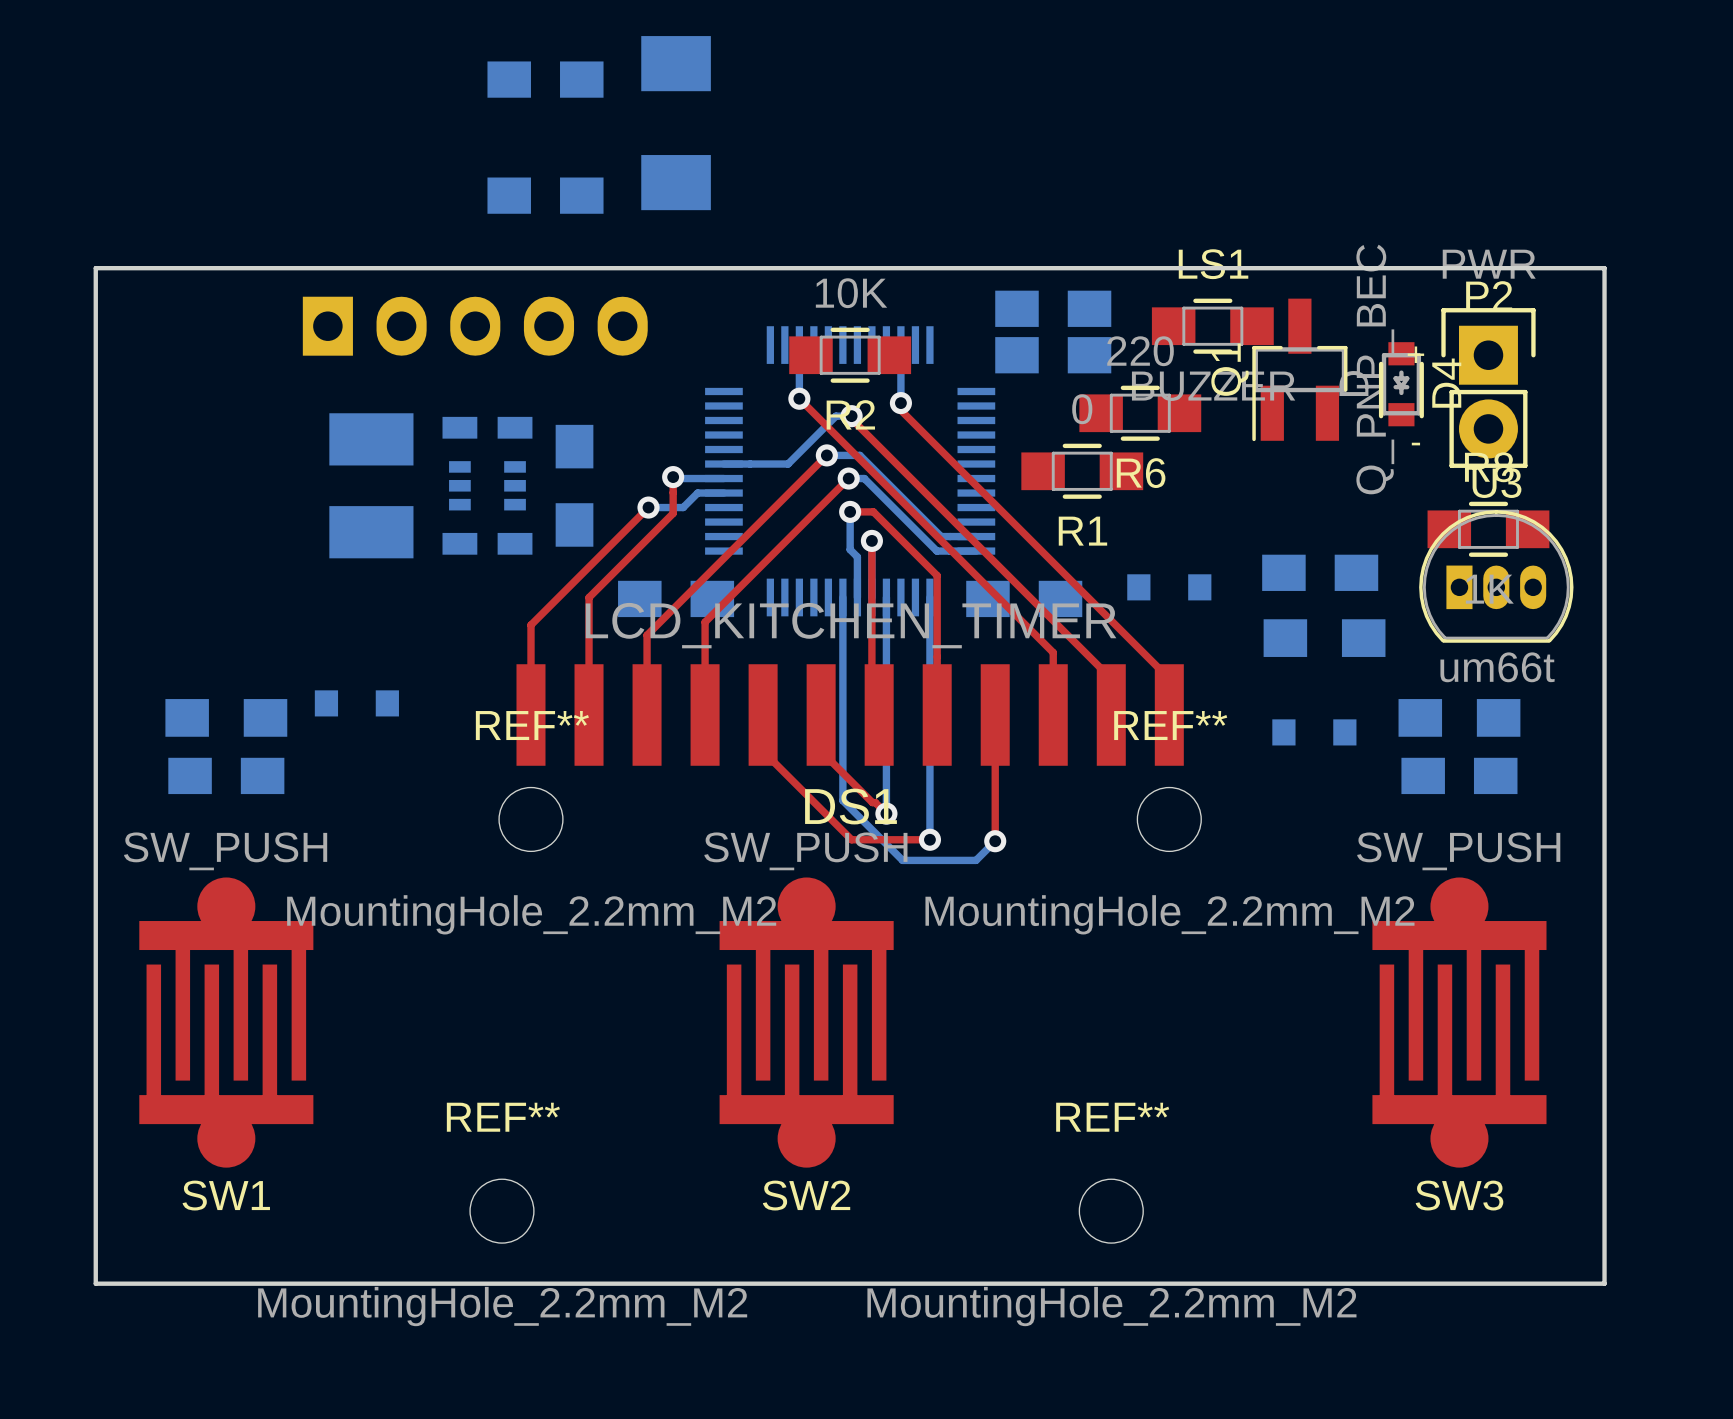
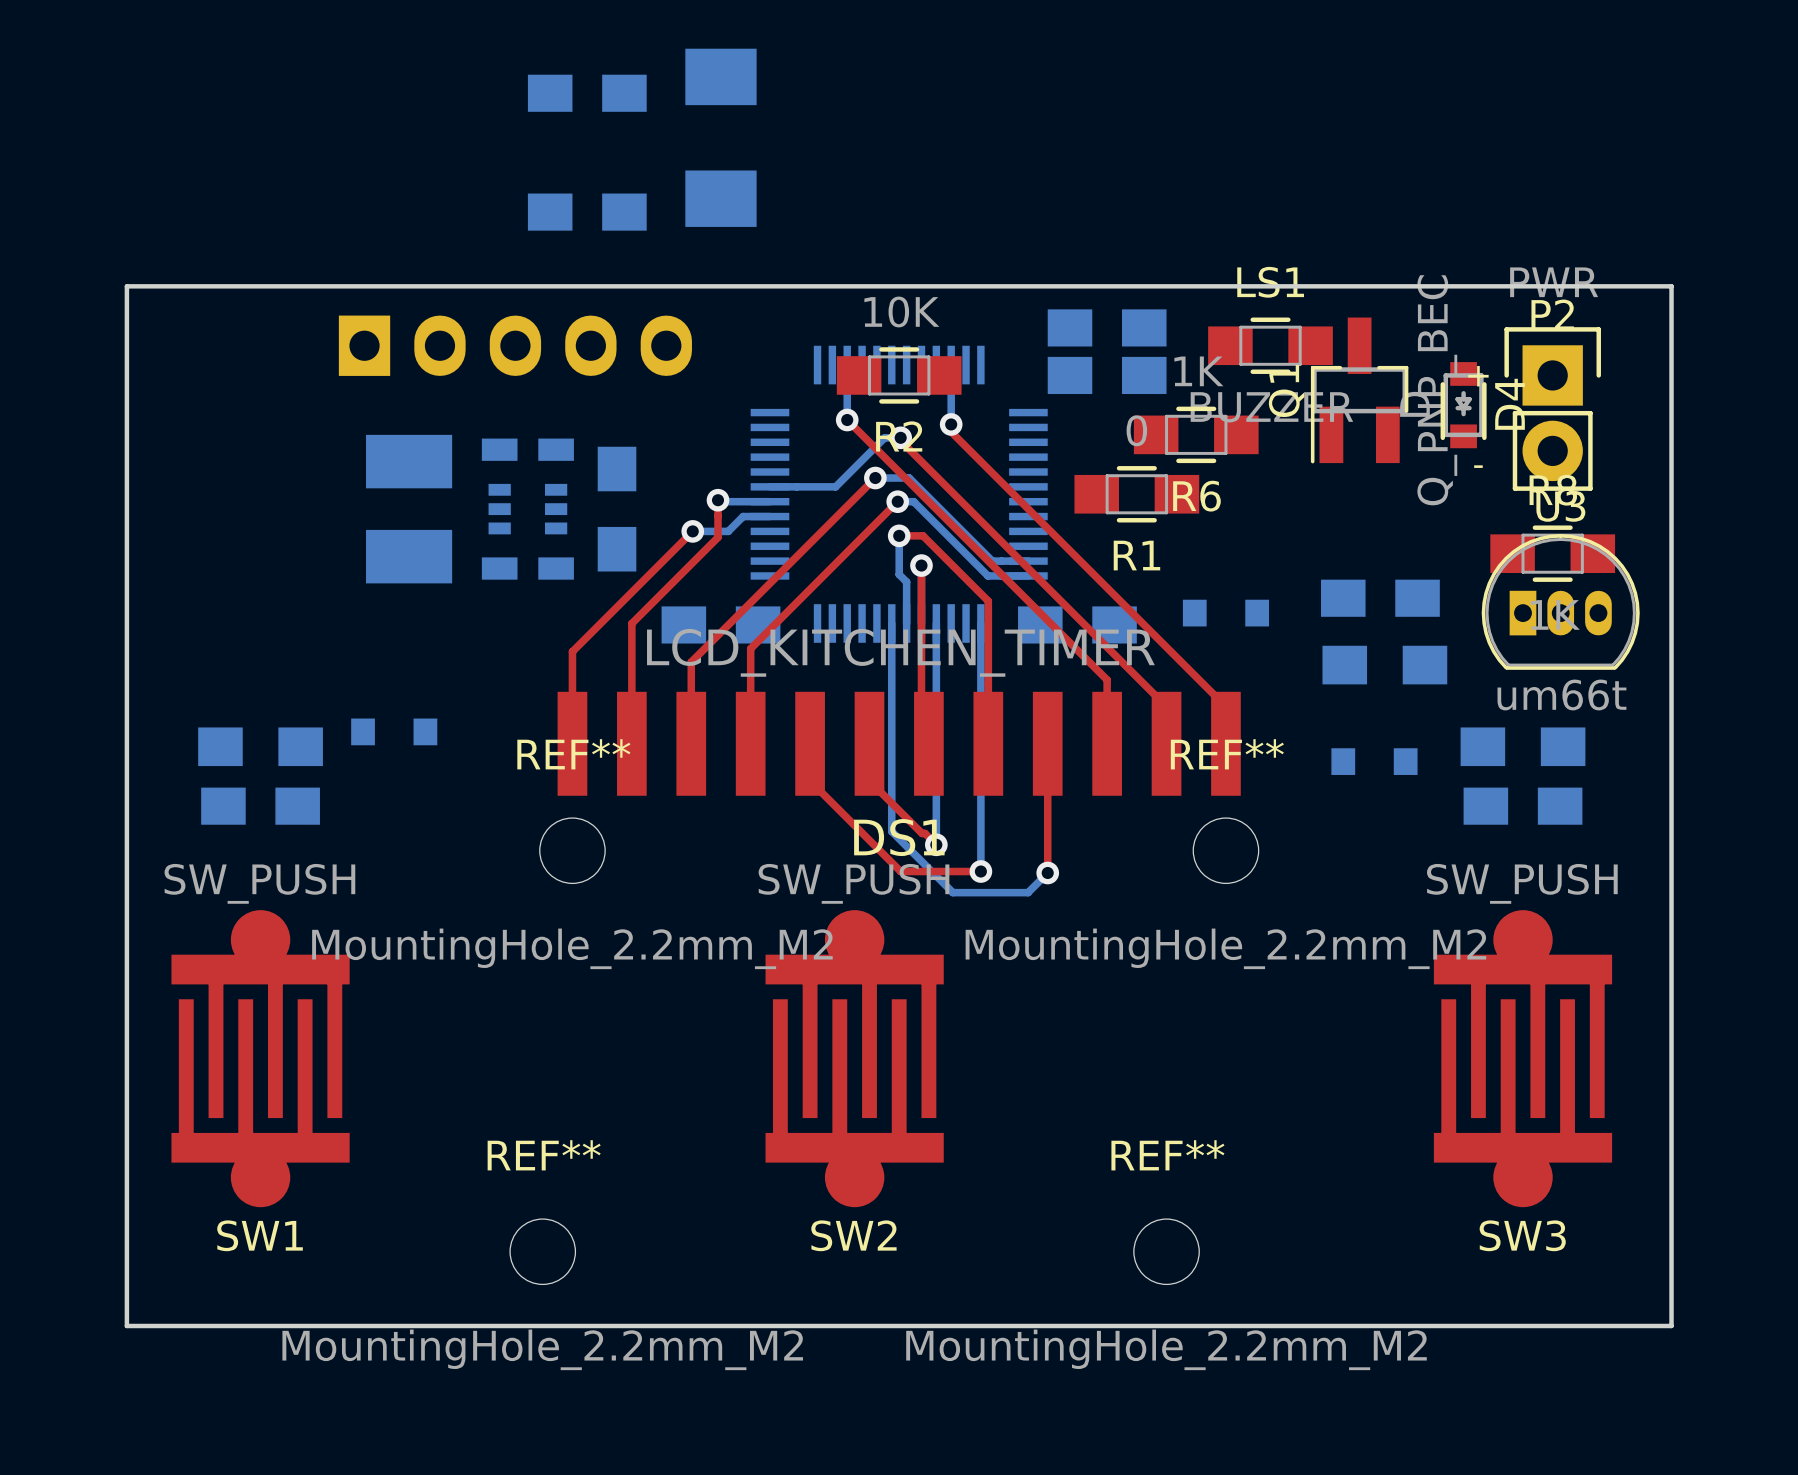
R6 value: 220 (1140, 351) -> 1K (1198, 371)

